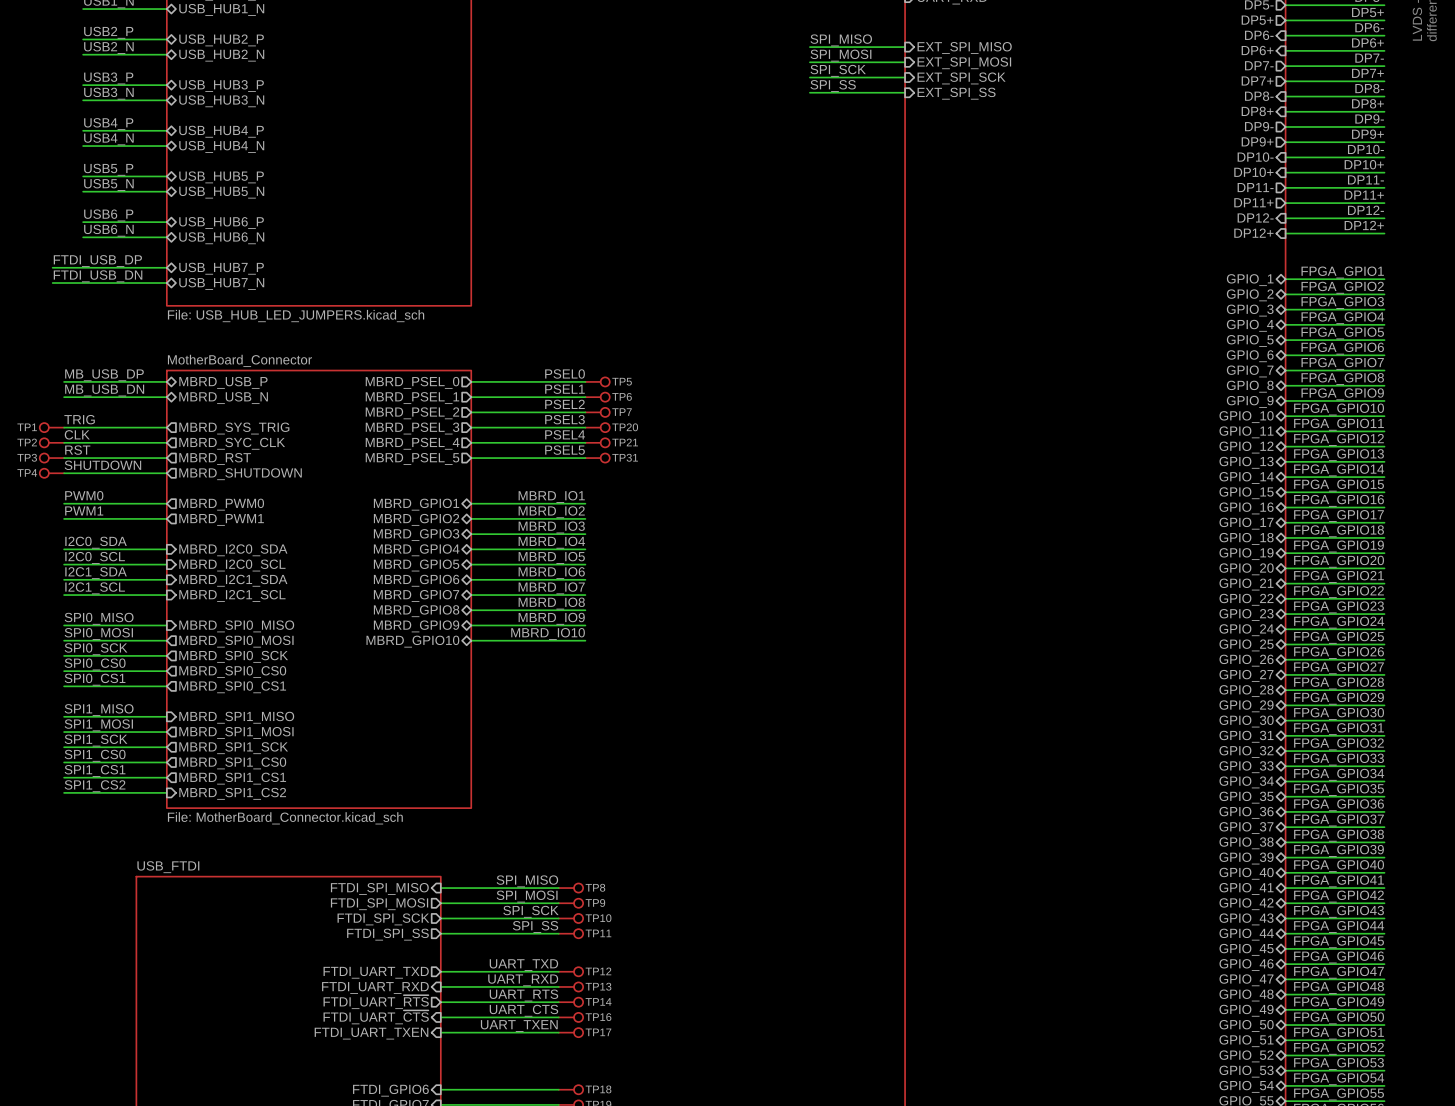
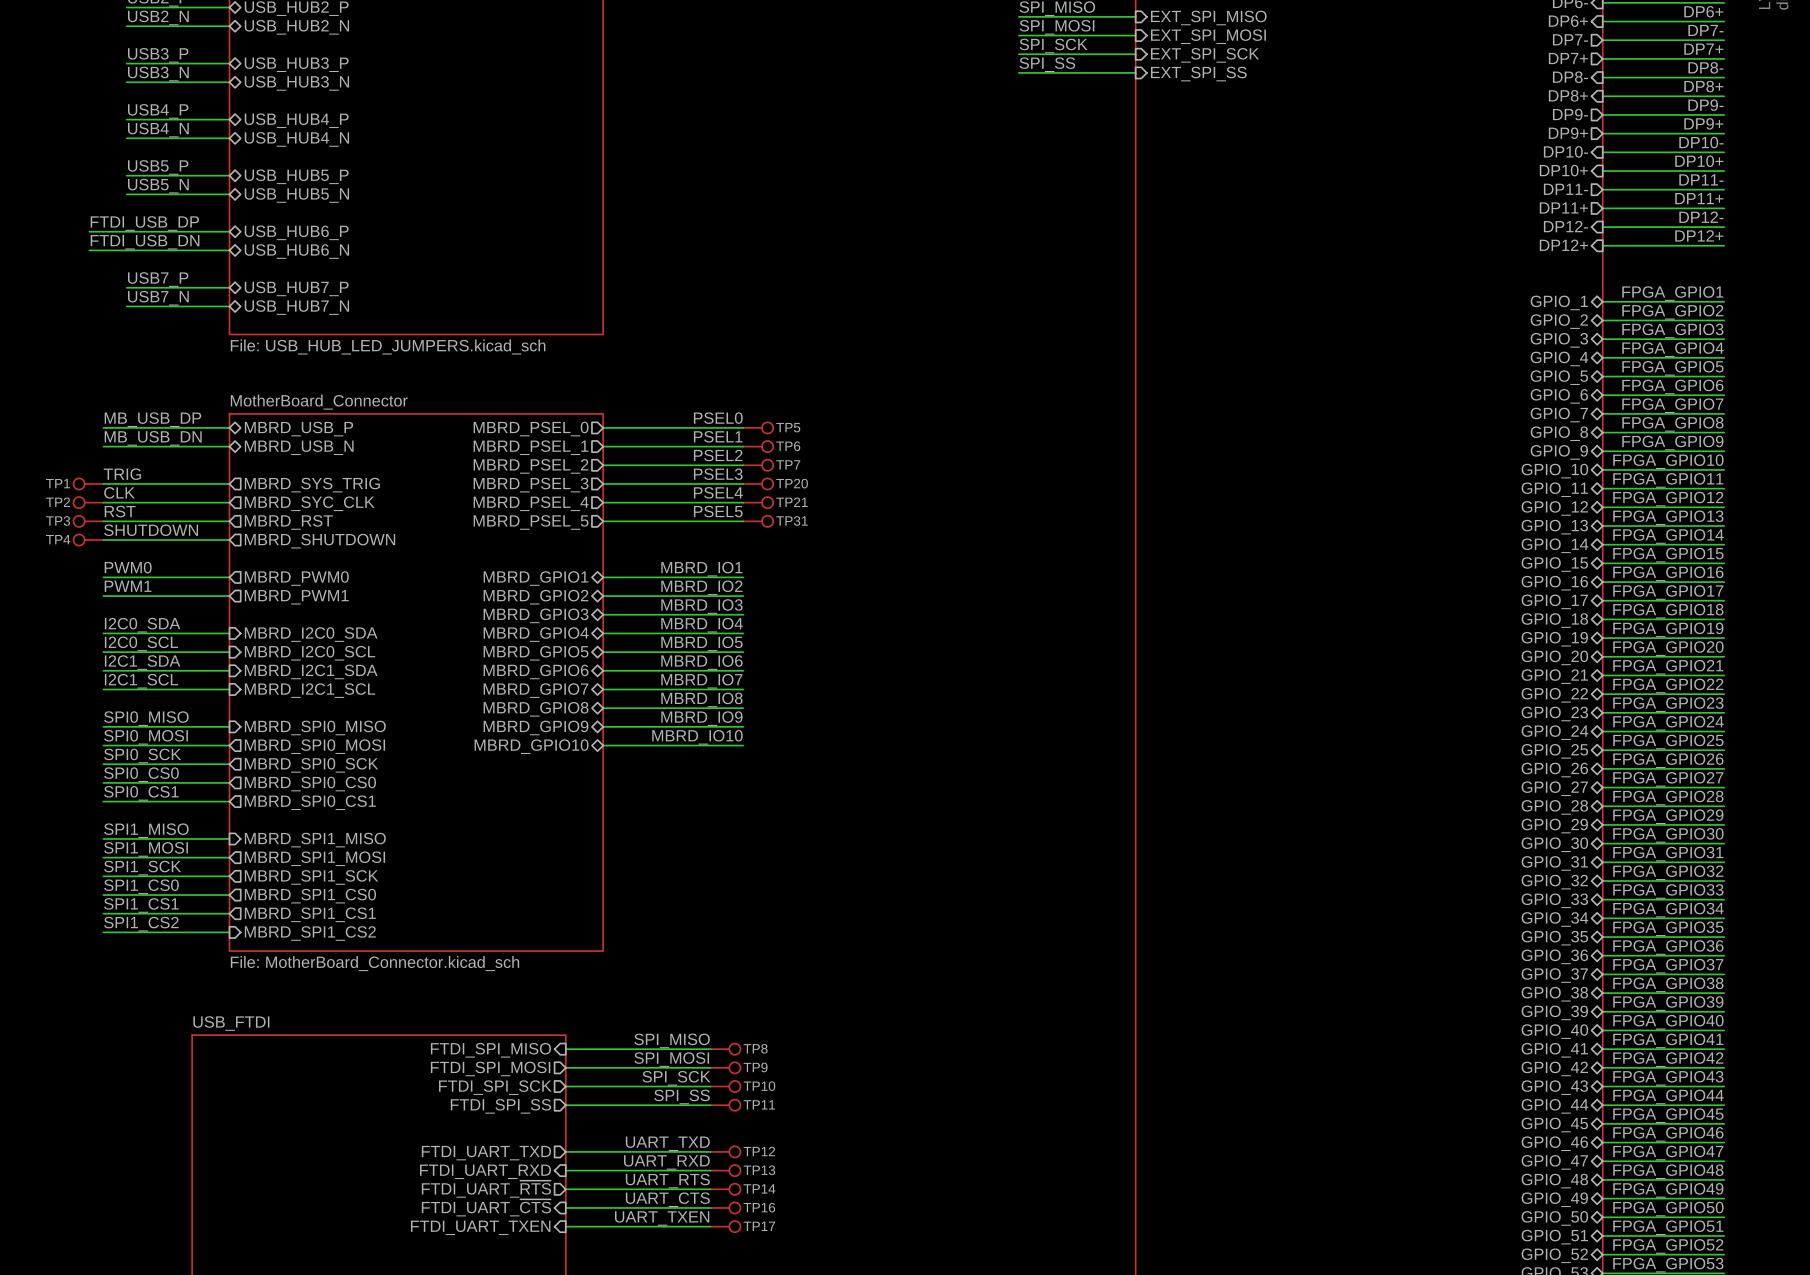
label: USB6_P (108, 215) -> none
label: USB6_N (108, 230) -> none
label position: FTDI_USB_DP (97, 261) -> FTDI_USB_DP (144, 223)
label: none -> USB7_P (158, 279)
wire: (52, 267) (83, 267) -> (89, 250) (126, 250)
label position: FTDI_USB_DN (98, 276) -> FTDI_USB_DN (145, 242)
label: none -> USB7_N (158, 298)
wire: (52, 283) (83, 283) -> (89, 231) (126, 231)

